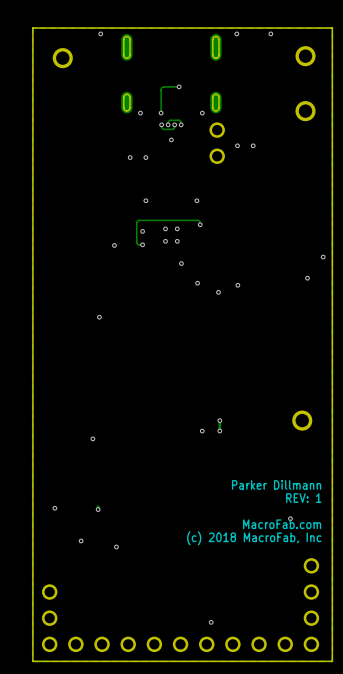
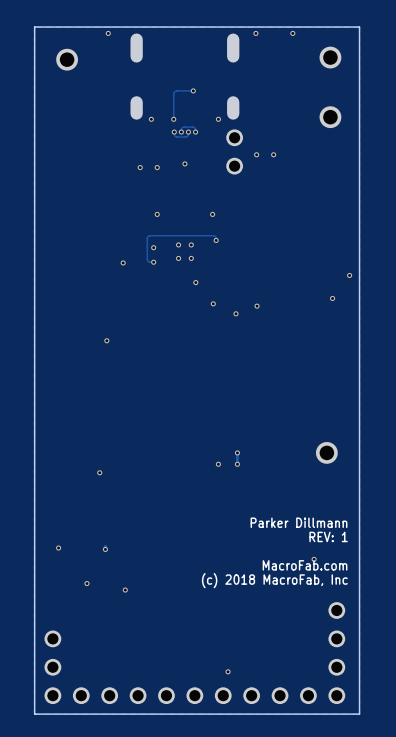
via position: (171, 139) -> (184, 163)

